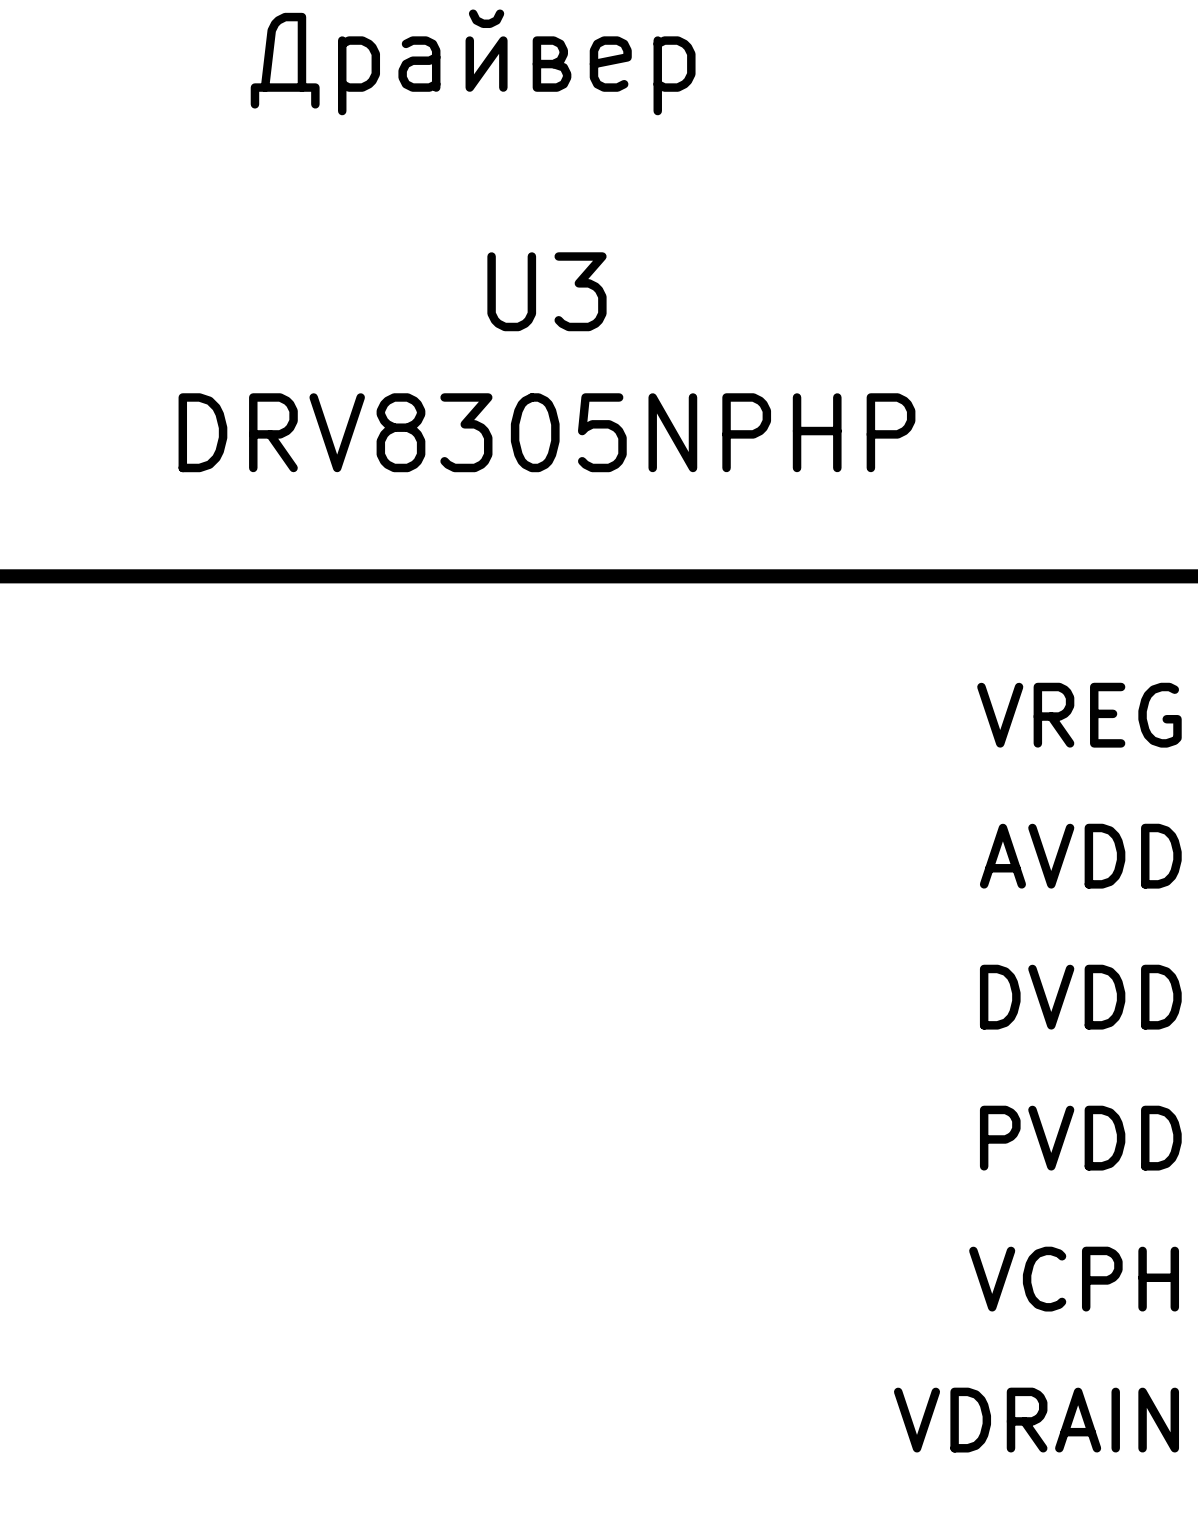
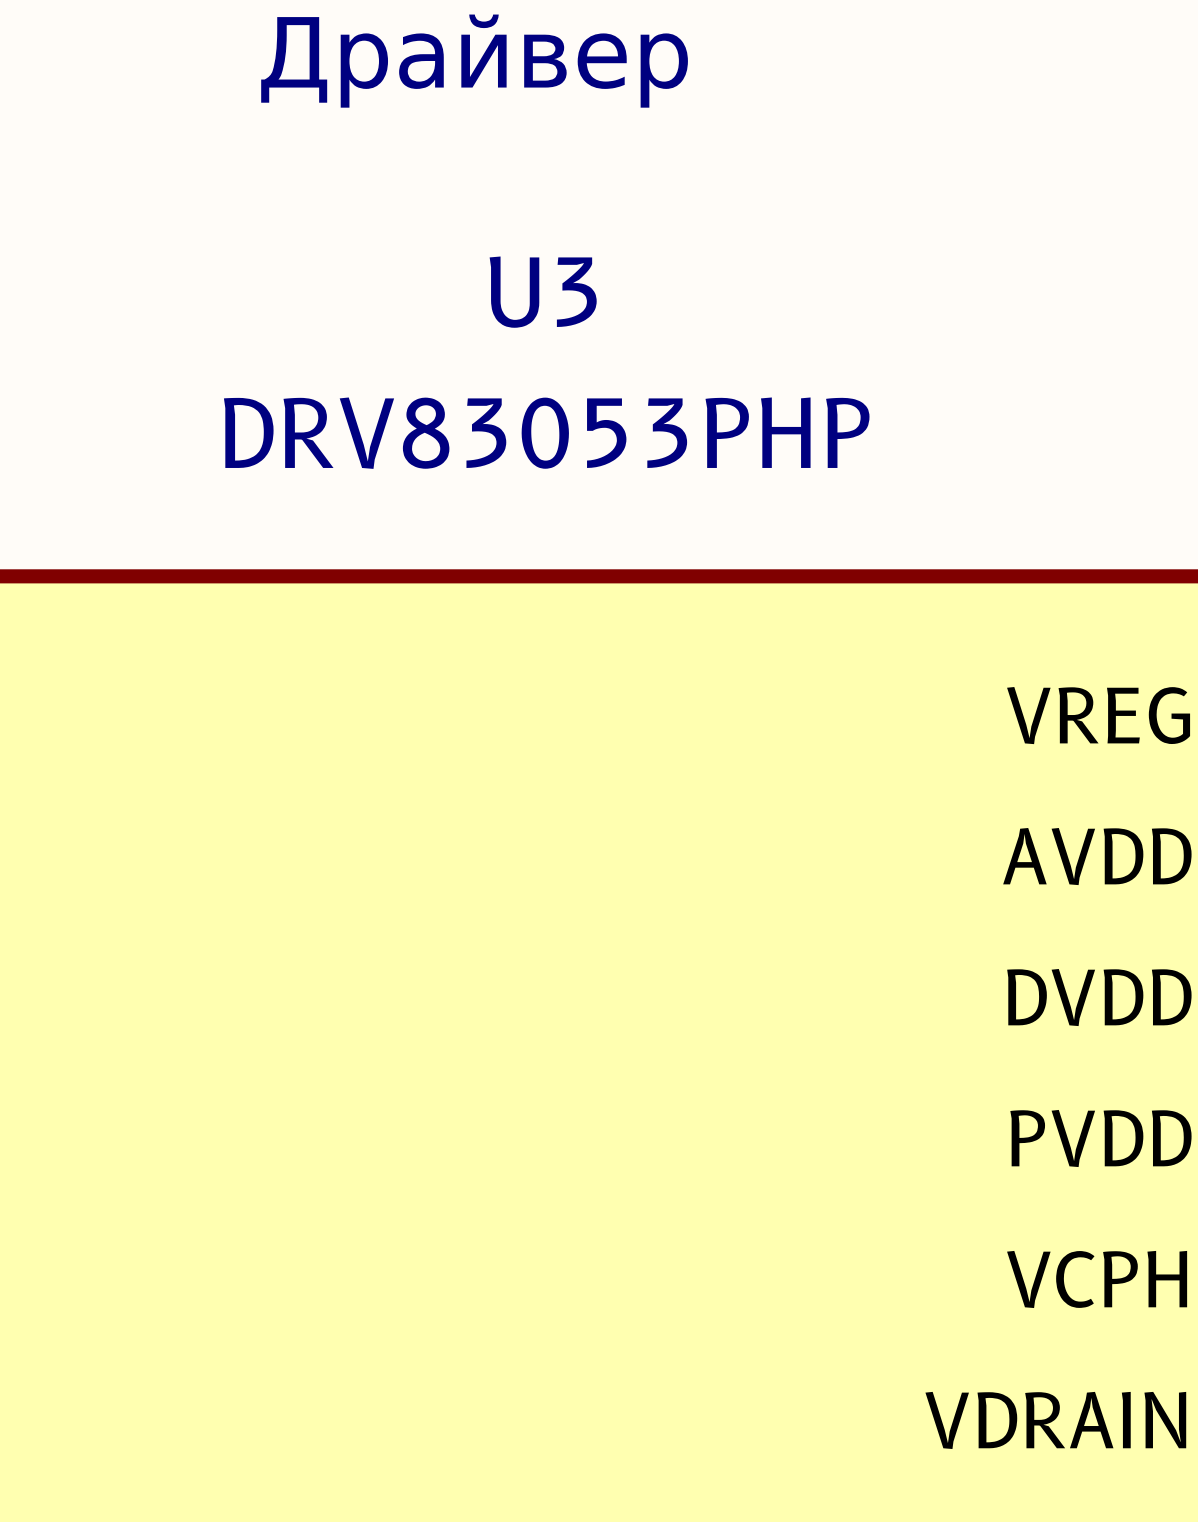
U3 value: DRV8305NPHP (546, 432) -> DRV83053PHP (546, 433)

